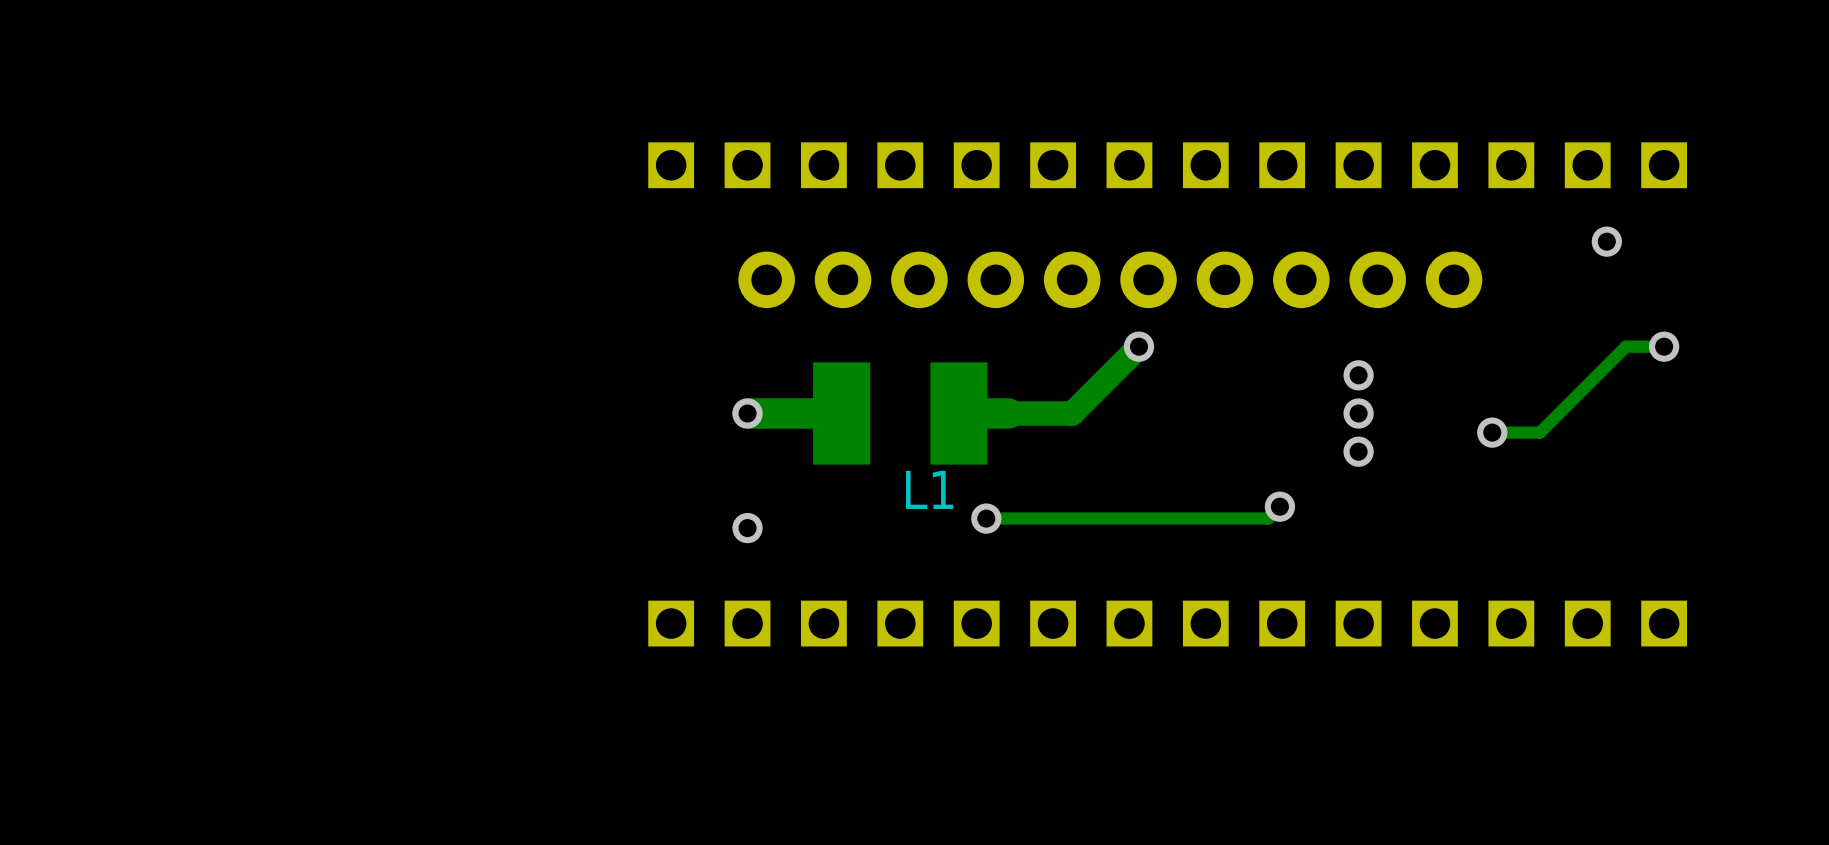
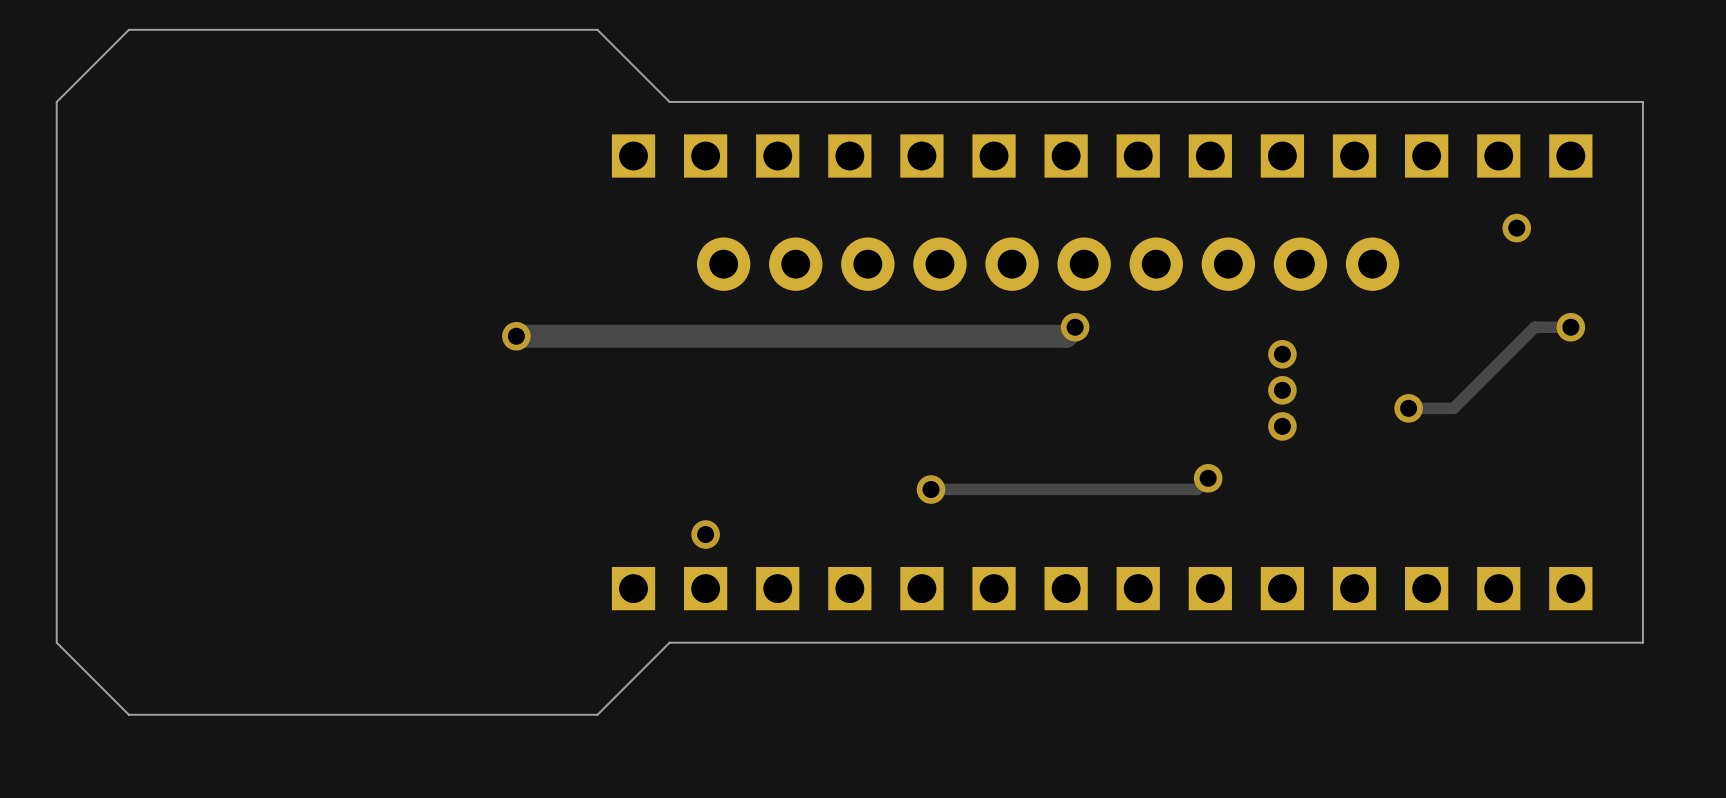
board edge: none -> (597, 29) (669, 101) (1642, 101) (1642, 642) (669, 642) (597, 714) (128, 714) (56, 642) (56, 101) (128, 29) (597, 29)
via: none -> (516, 336)
track: (1129, 356) (1072, 413) (958, 413) -> (1066, 336) (516, 336)
via: (747, 413) -> none
track: (841, 413) (747, 413) -> none
L1: (900, 413) -> none
via position: (747, 528) -> (705, 534)

